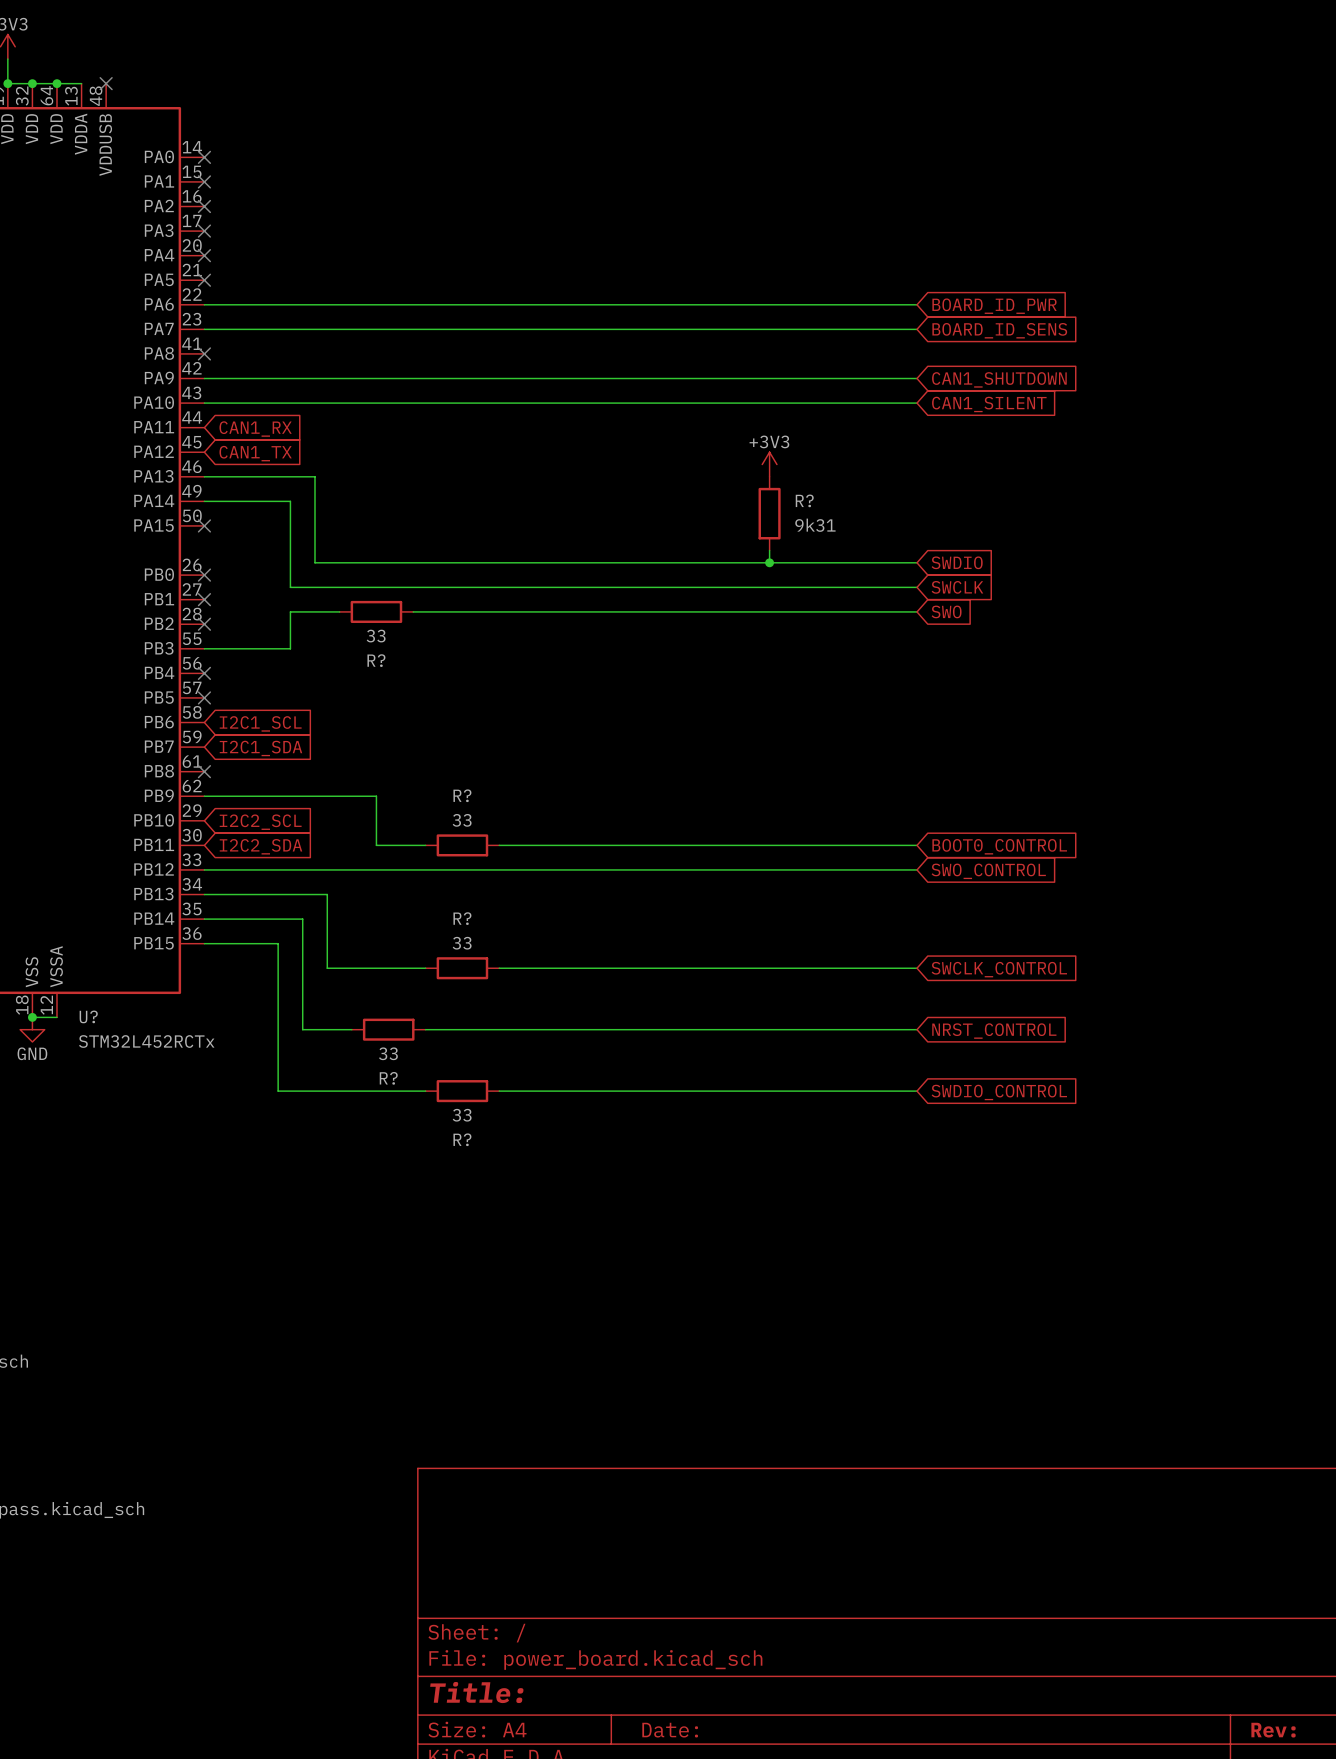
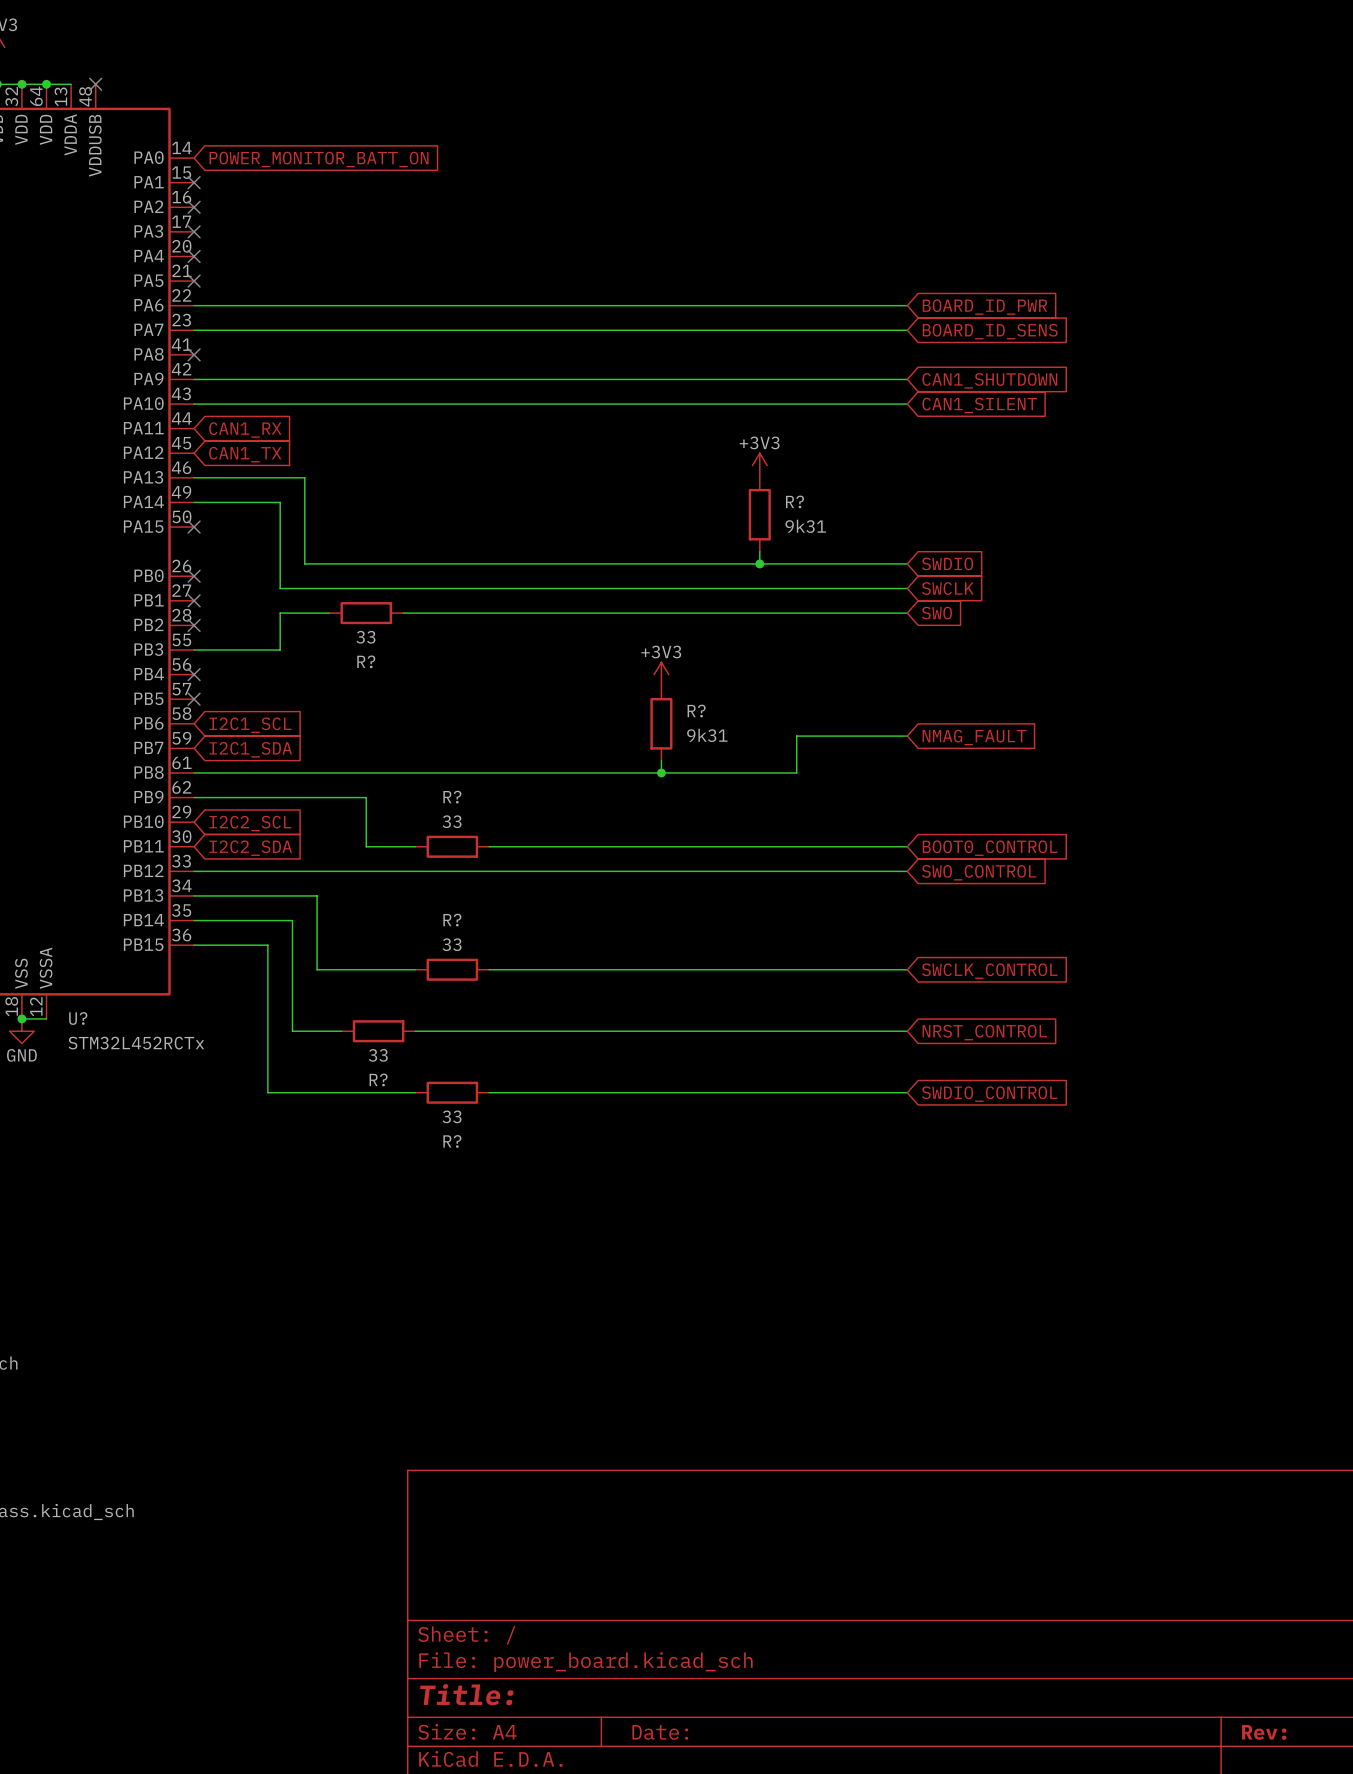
no-connect mark: (204, 157) -> none
global label: none -> POWER_MONITOR_BATT_ON (319, 159)
power symbol: none -> +3V3 (661, 674)
R?: none -> 9k31 (661, 723)
wire: none -> (907, 736) (796, 736) (796, 772) (194, 772)
global label: none -> NMAG_FAULT (974, 737)
wire: none -> (661, 760) (661, 772)
no-connect mark: (204, 771) -> none
junction: none -> (661, 772)

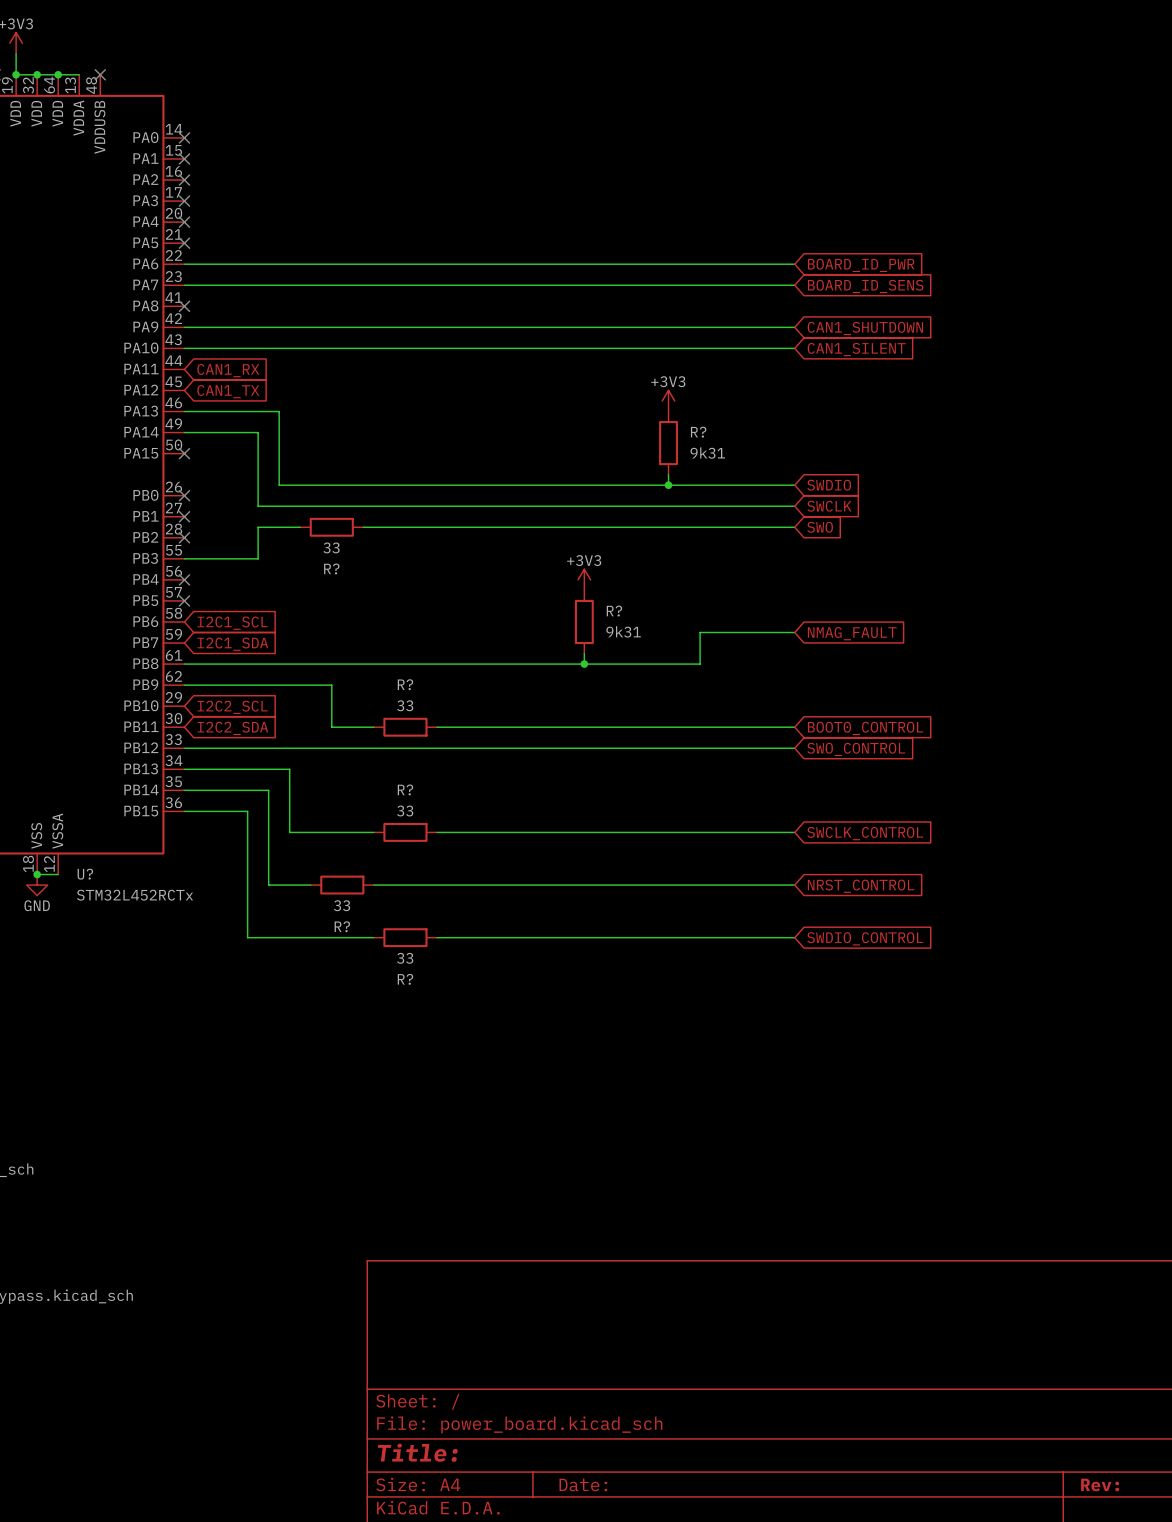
no-connect mark: none -> (184, 137)
global label: POWER_MONITOR_BATT_ON (319, 159) -> none

